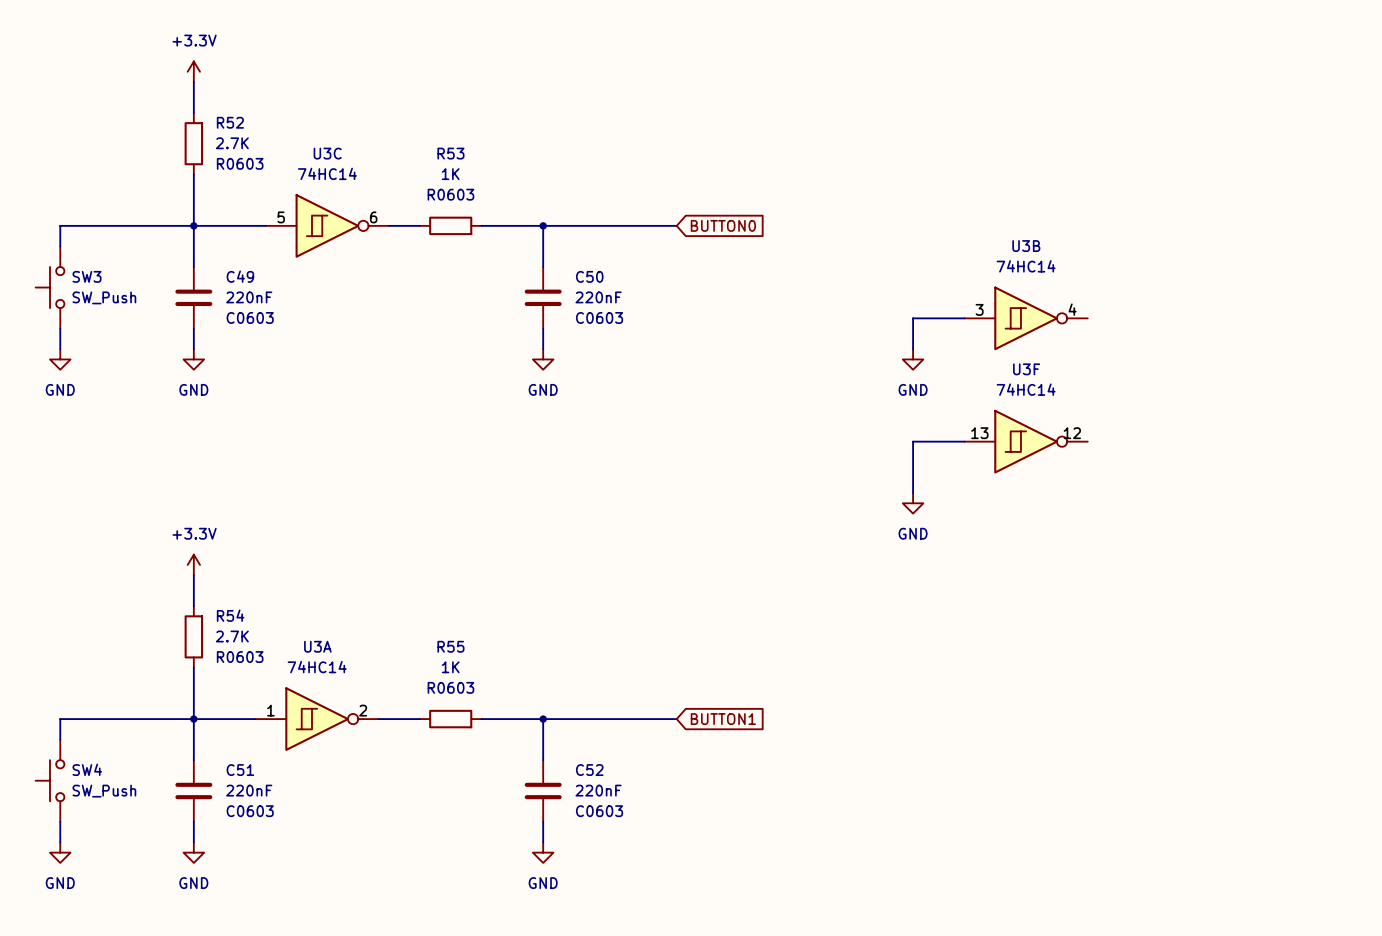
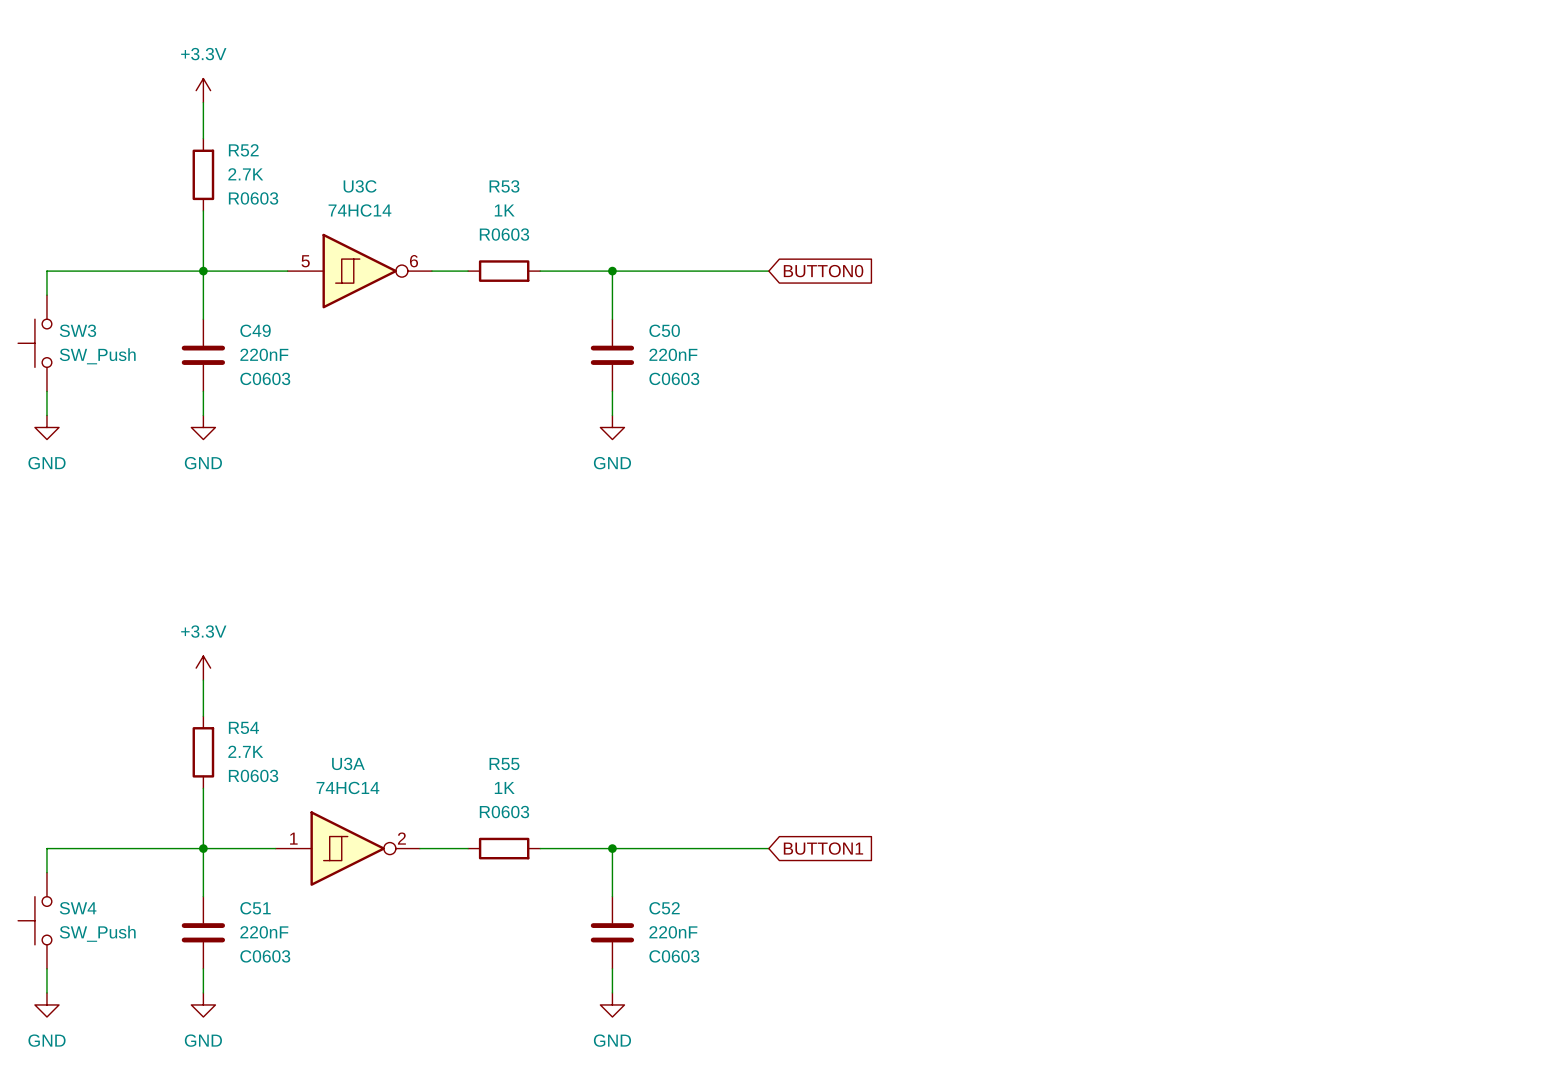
wire: (964, 318) (913, 318) (913, 349) -> none
U3B: 74HC14 (1026, 318) -> none
power symbol: GND (913, 359) -> none
wire: (964, 441) (913, 441) (913, 493) -> none
U3F: 74HC14 (1026, 441) -> none
power symbol: GND (913, 503) -> none

